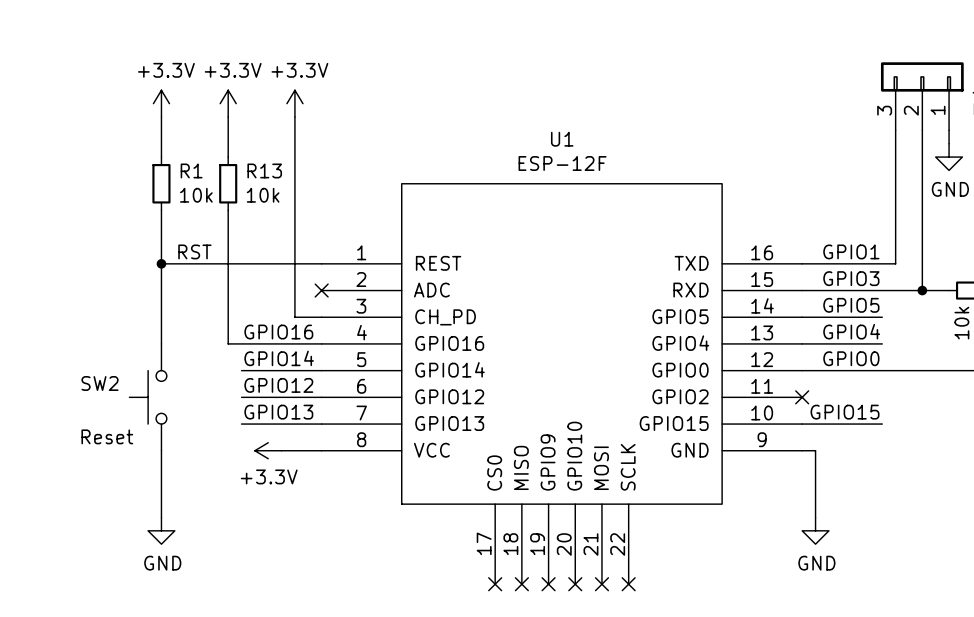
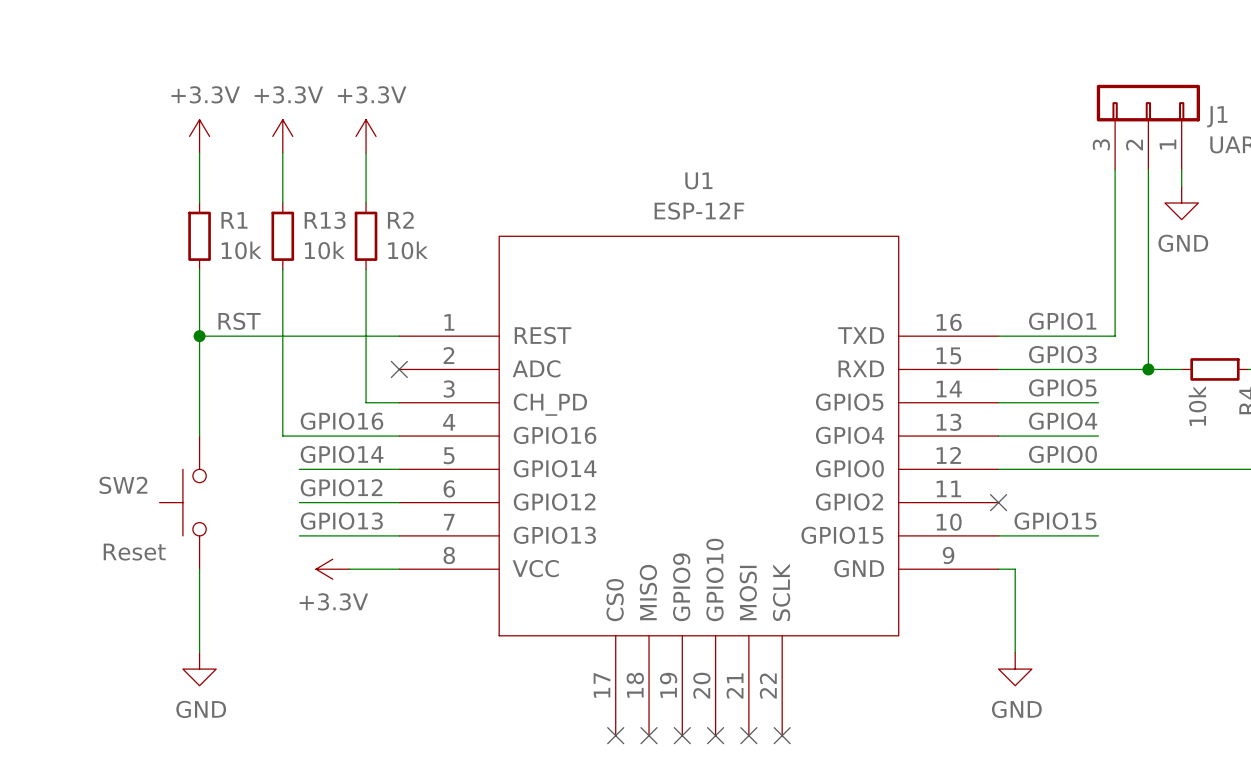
wire: (294, 157) (294, 210) -> none
R2: none -> 10k (366, 236)

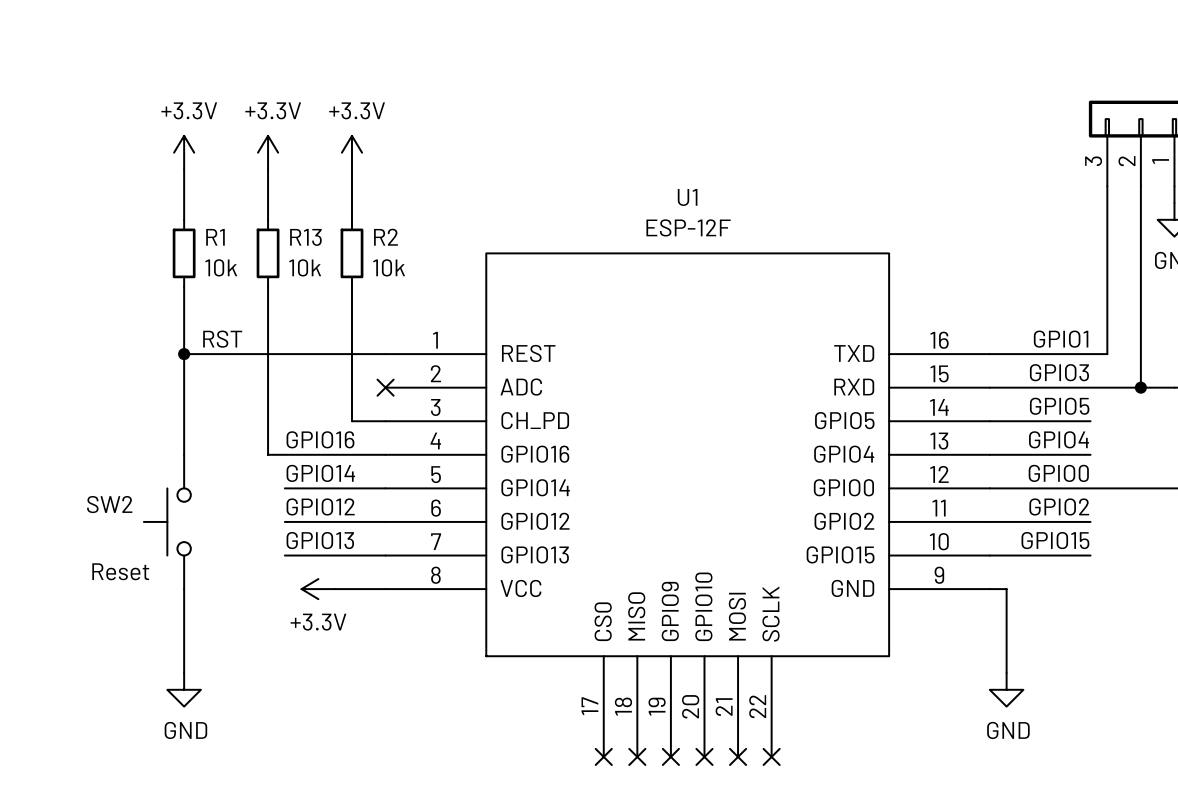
label: none -> GPIO2 (1059, 506)
wire: none -> (989, 521) (1090, 521)
no-connect mark: (998, 502) -> none

